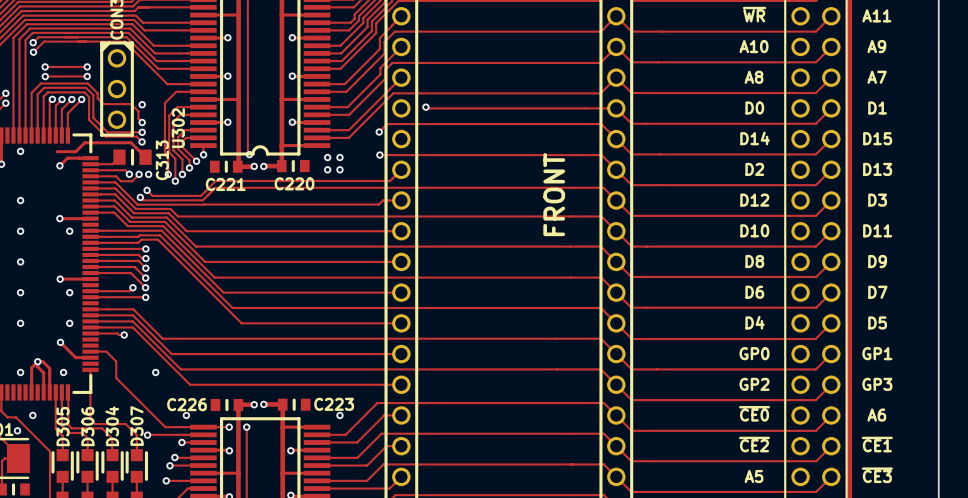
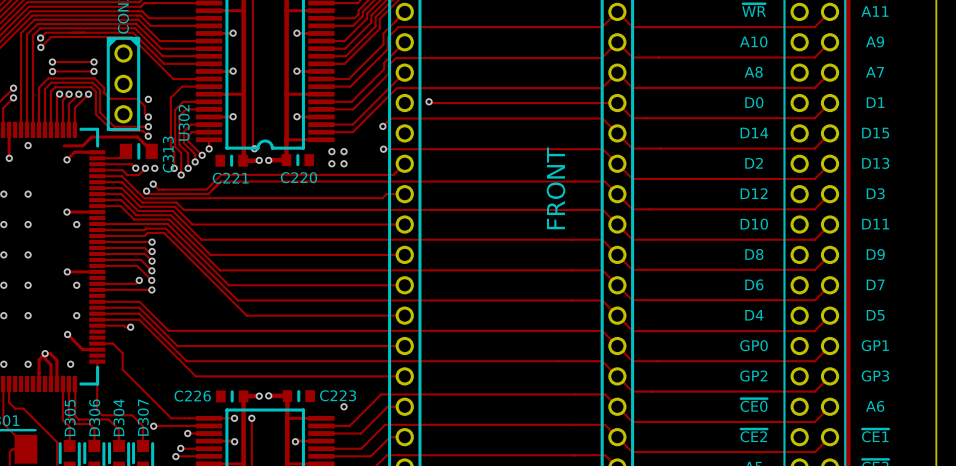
via: (155, 372) -> none
via: (32, 415) -> none
via: (186, 415) -> none
via: (17, 430) -> none

